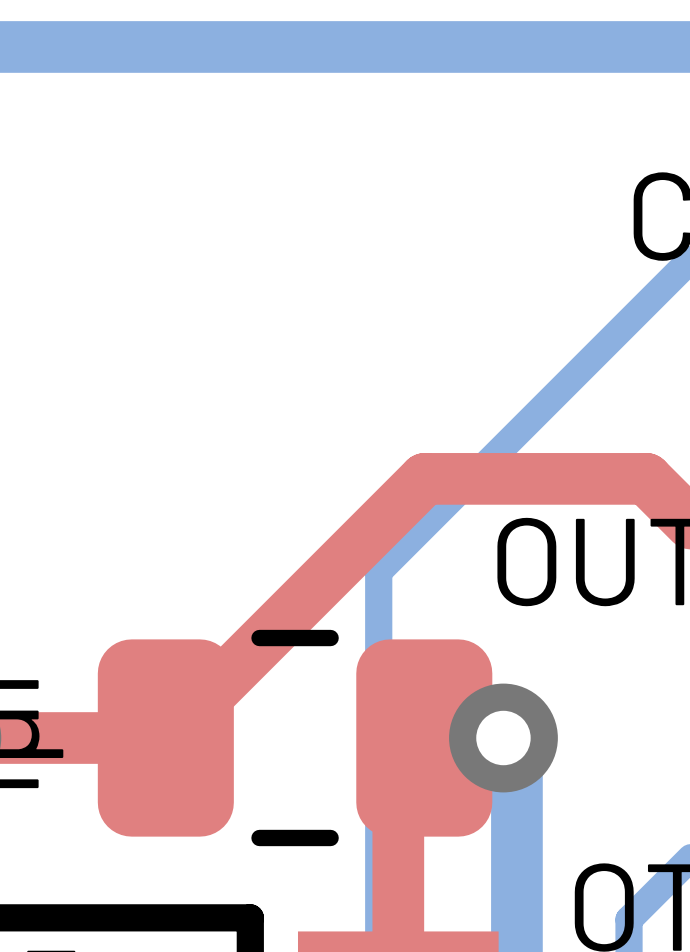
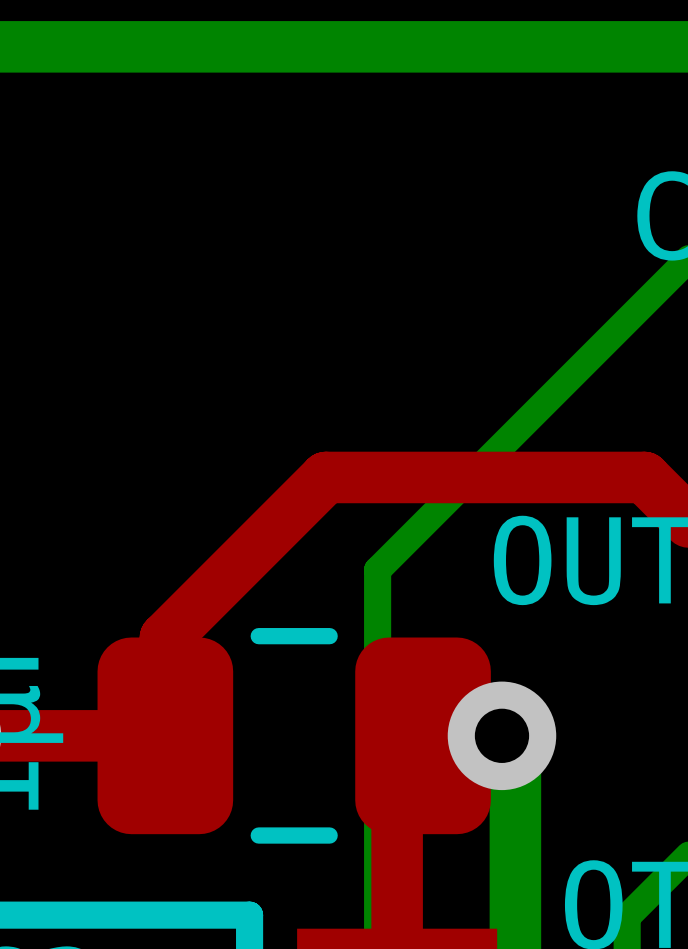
top track: (424, 478) (165, 738) -> (423, 477) (325, 477) (165, 638) (165, 735)

